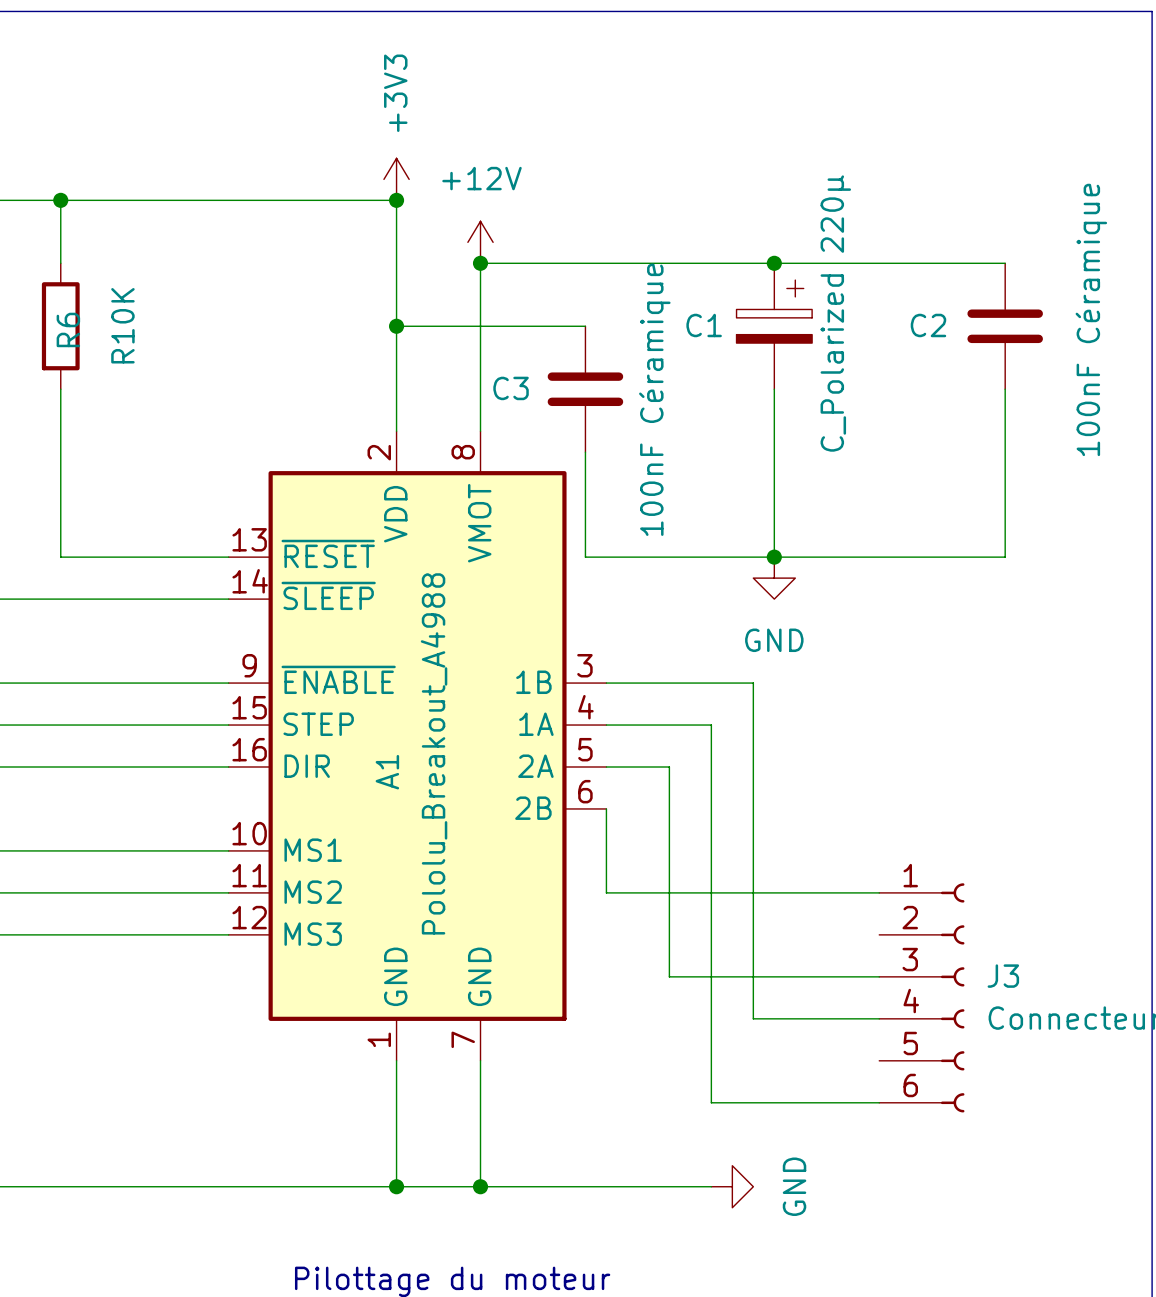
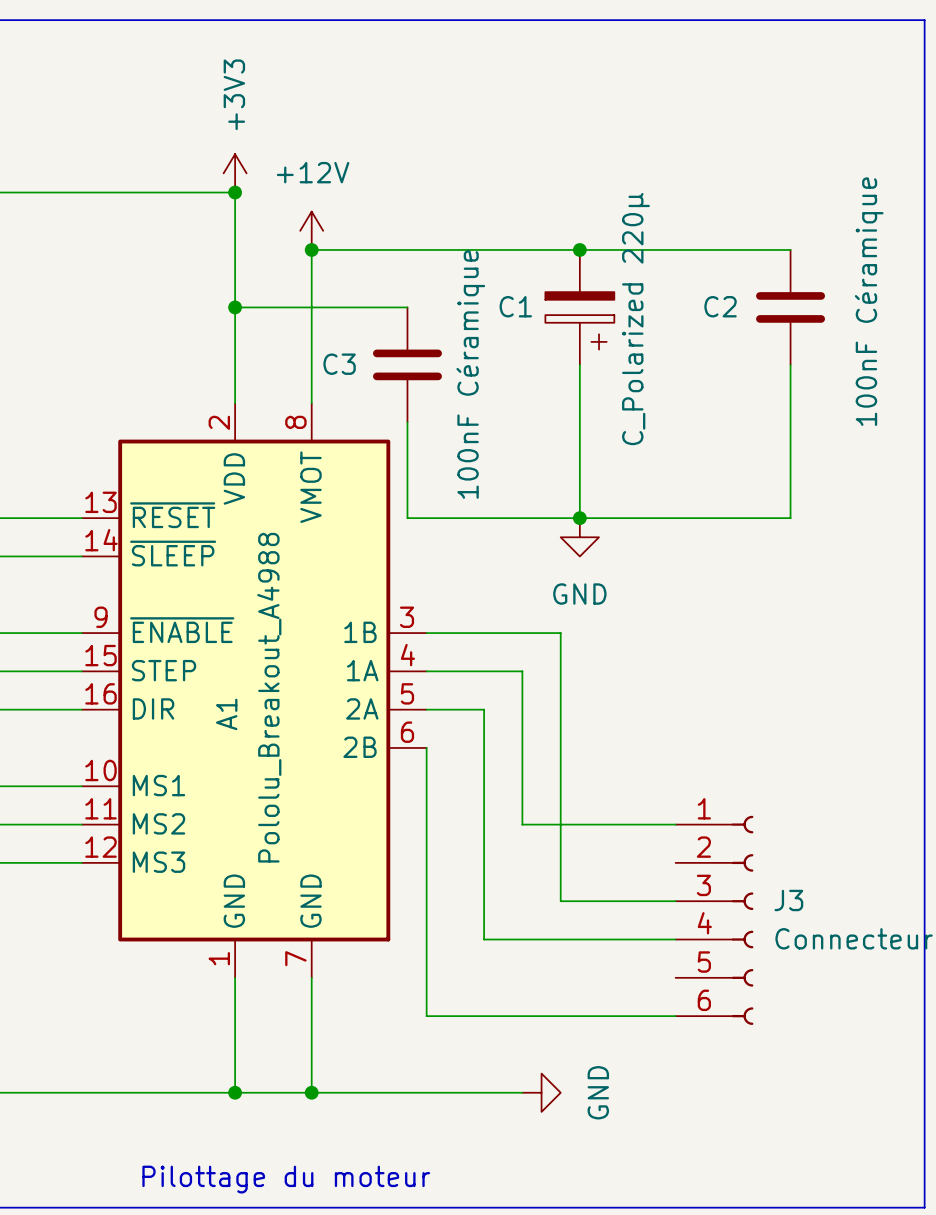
C1 flip: as is (774, 311) -> up-down (579, 320)
wire: (606, 892) (711, 892) (711, 1102) -> (426, 824) (426, 1016) (522, 1016)
wire: (669, 976) (753, 976) (753, 1018) -> (484, 901) (484, 939) (560, 939)

